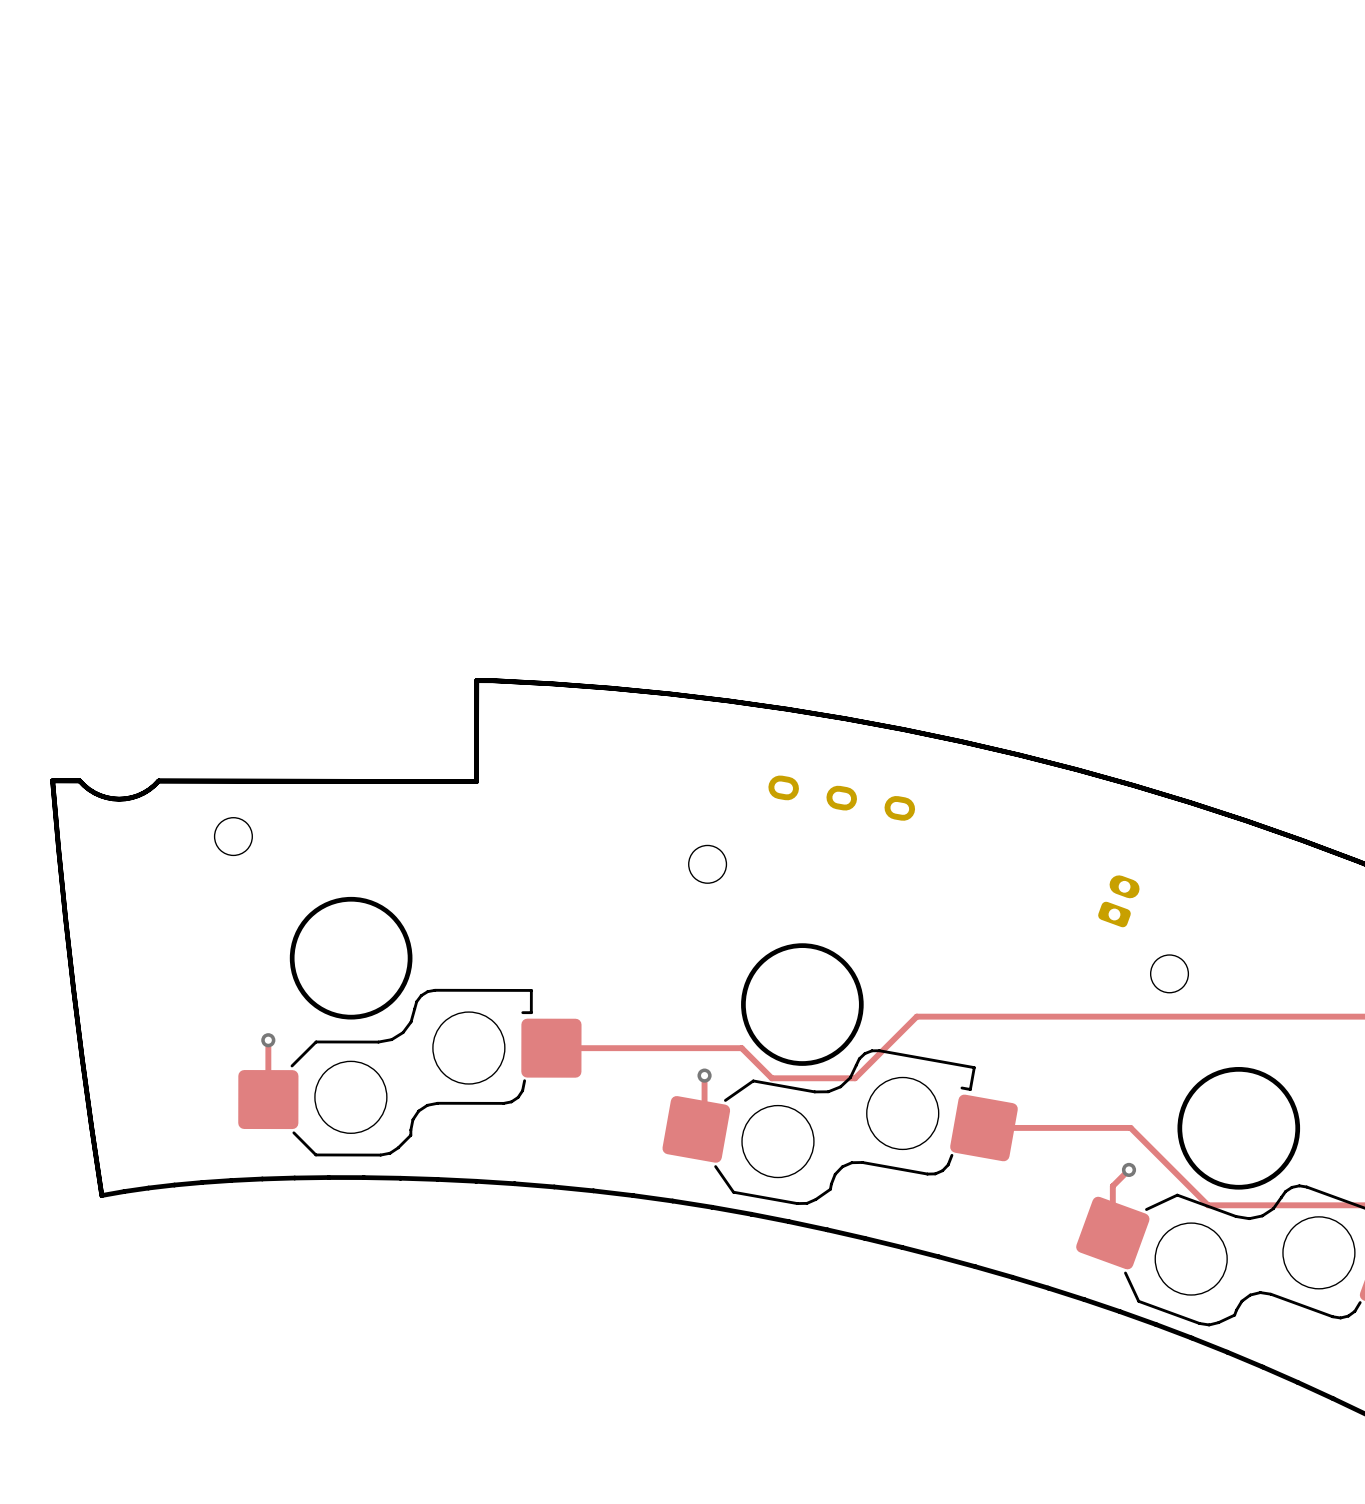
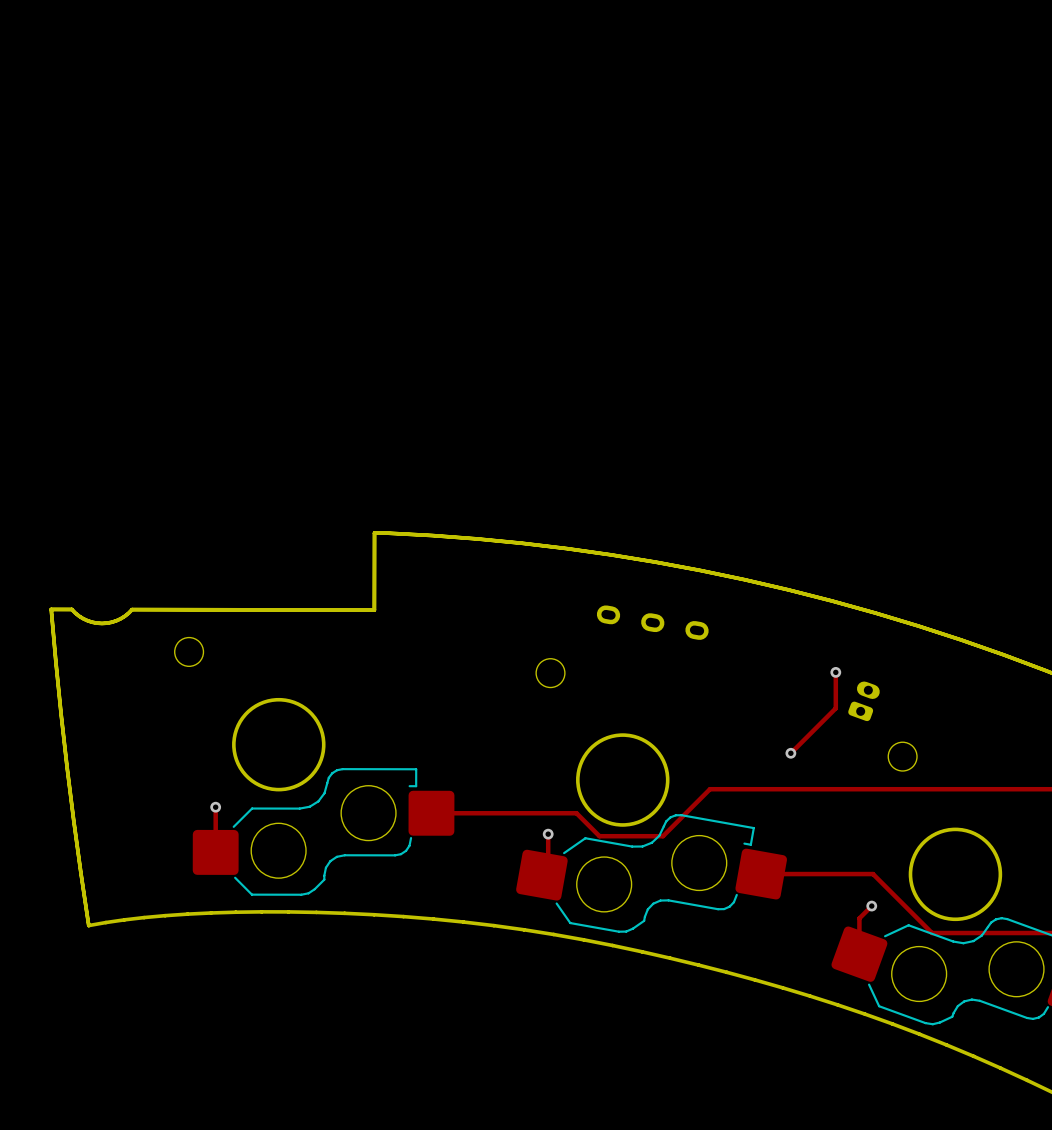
track: none -> (835, 672) (835, 708) (790, 753)
via: none -> (835, 672)
via: none -> (790, 753)

